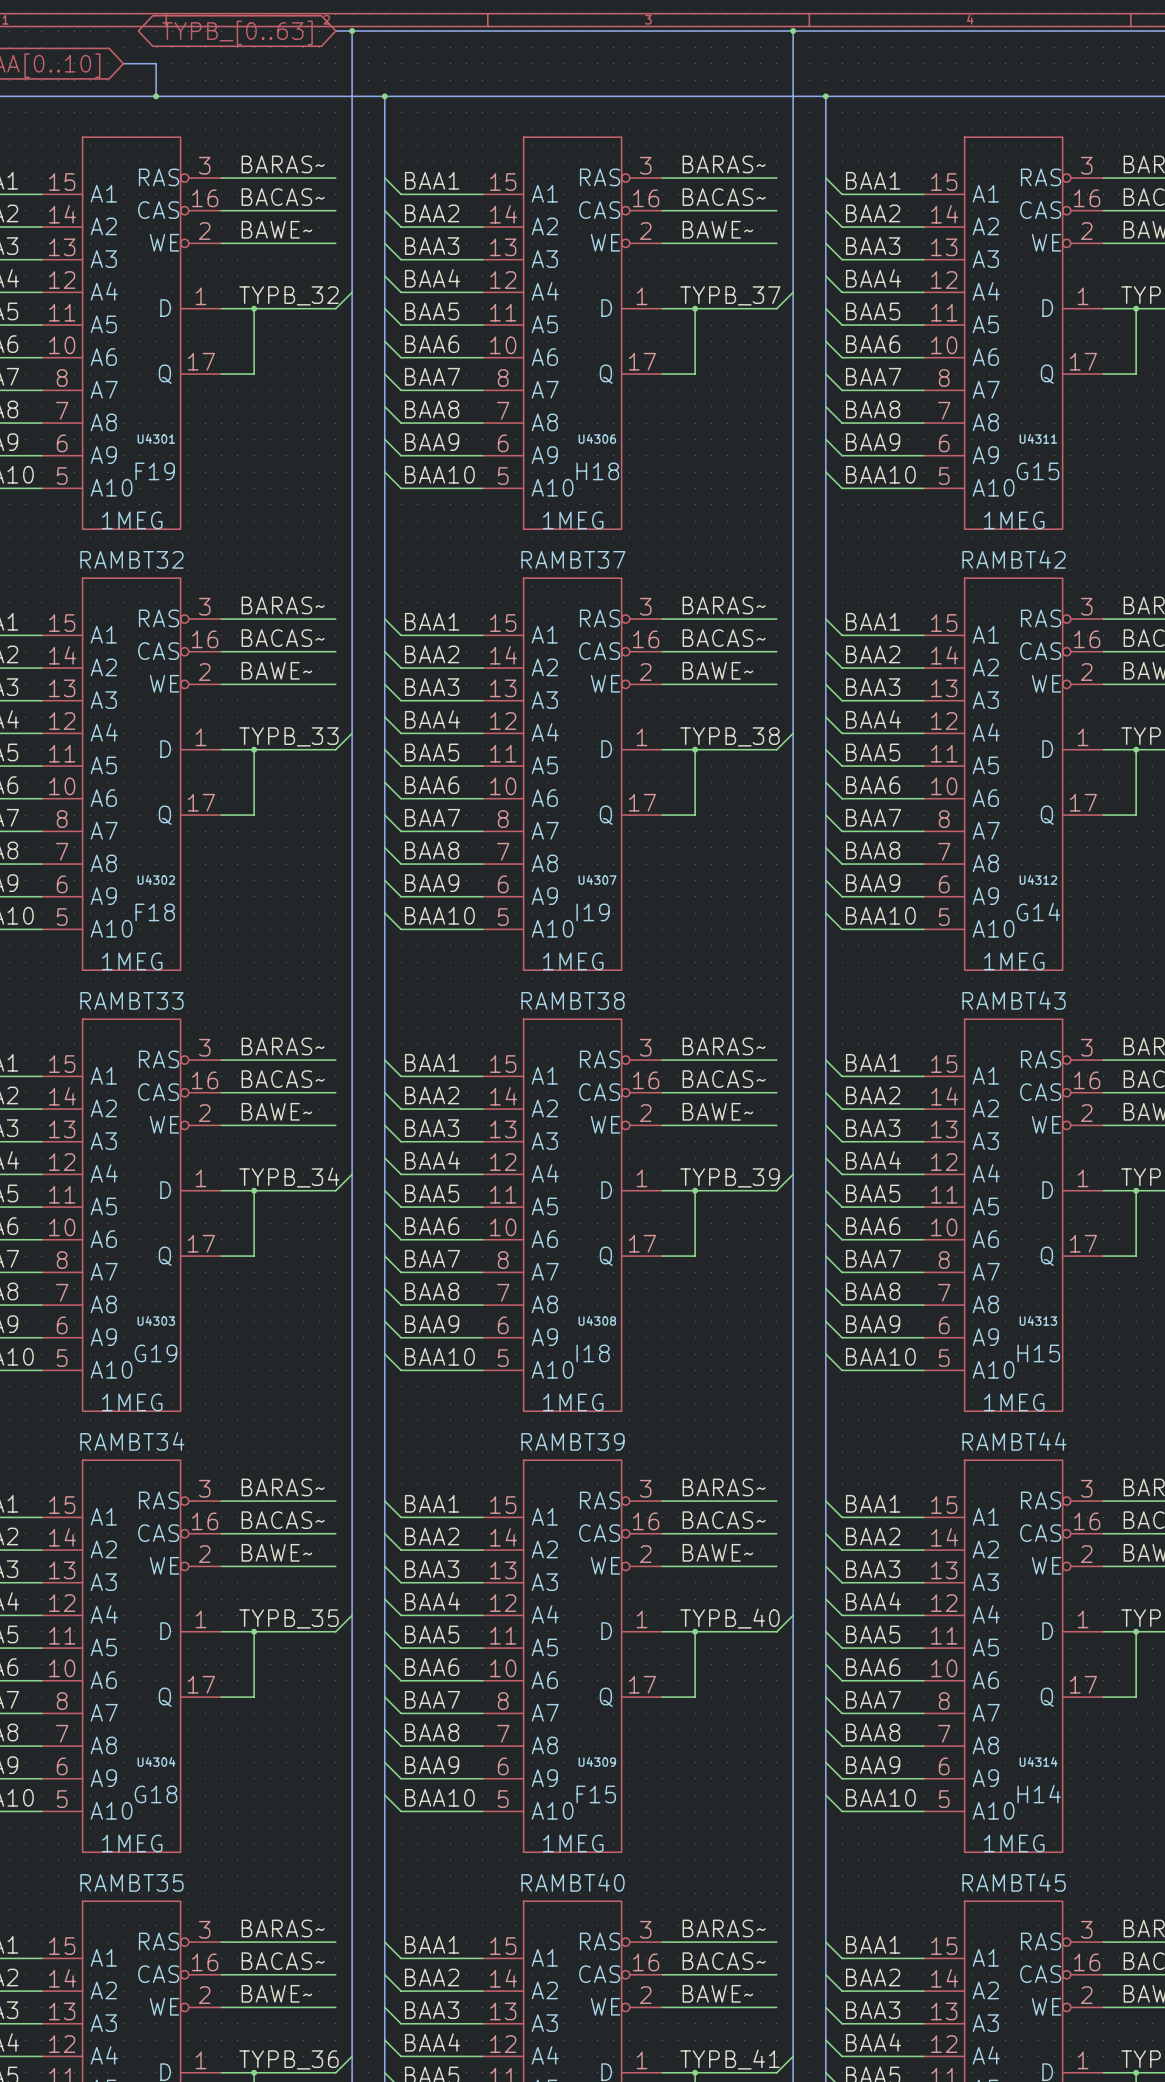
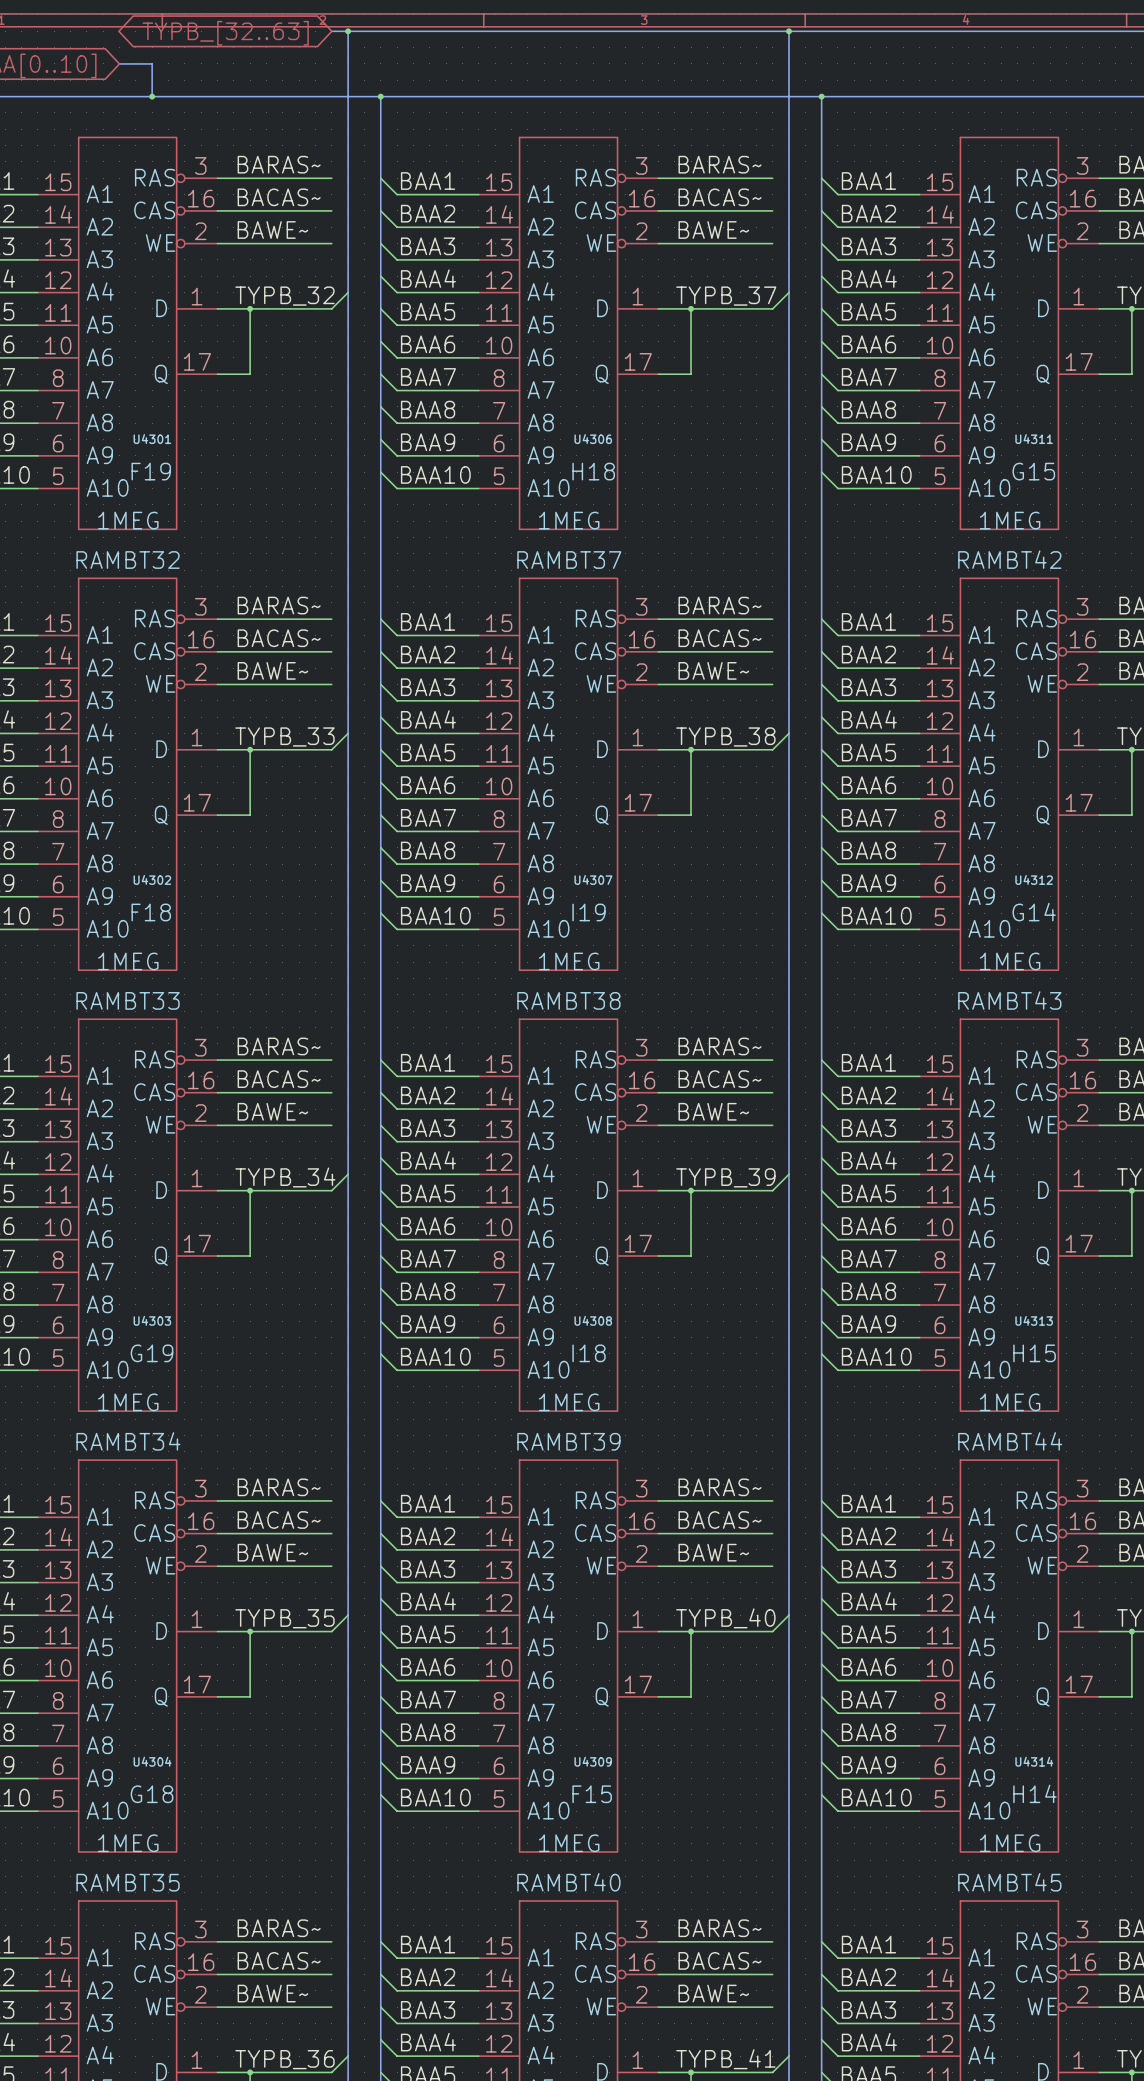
global label: TYPB_[0..63] (237, 32) -> TYPB_[32..63] (225, 33)

